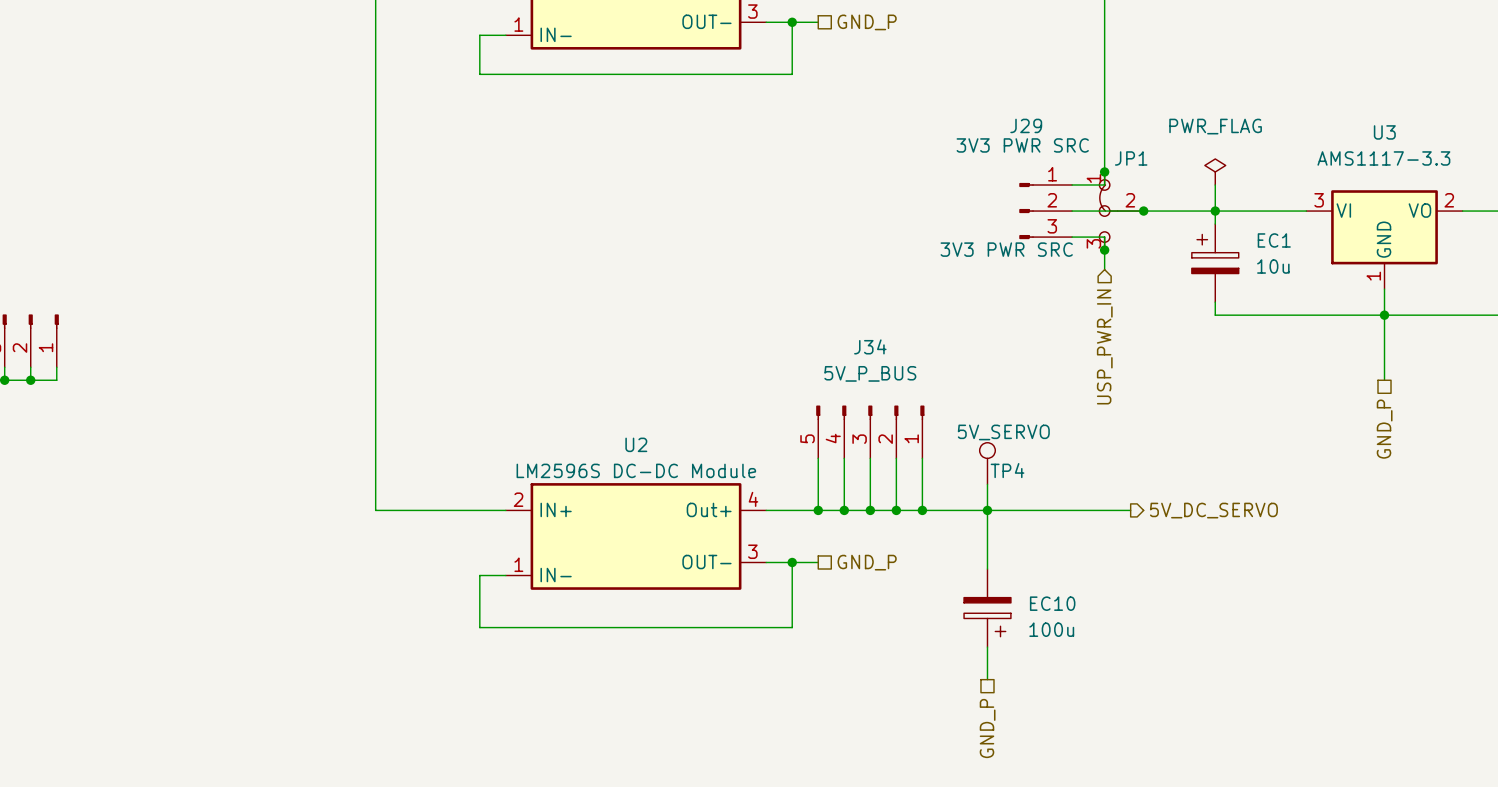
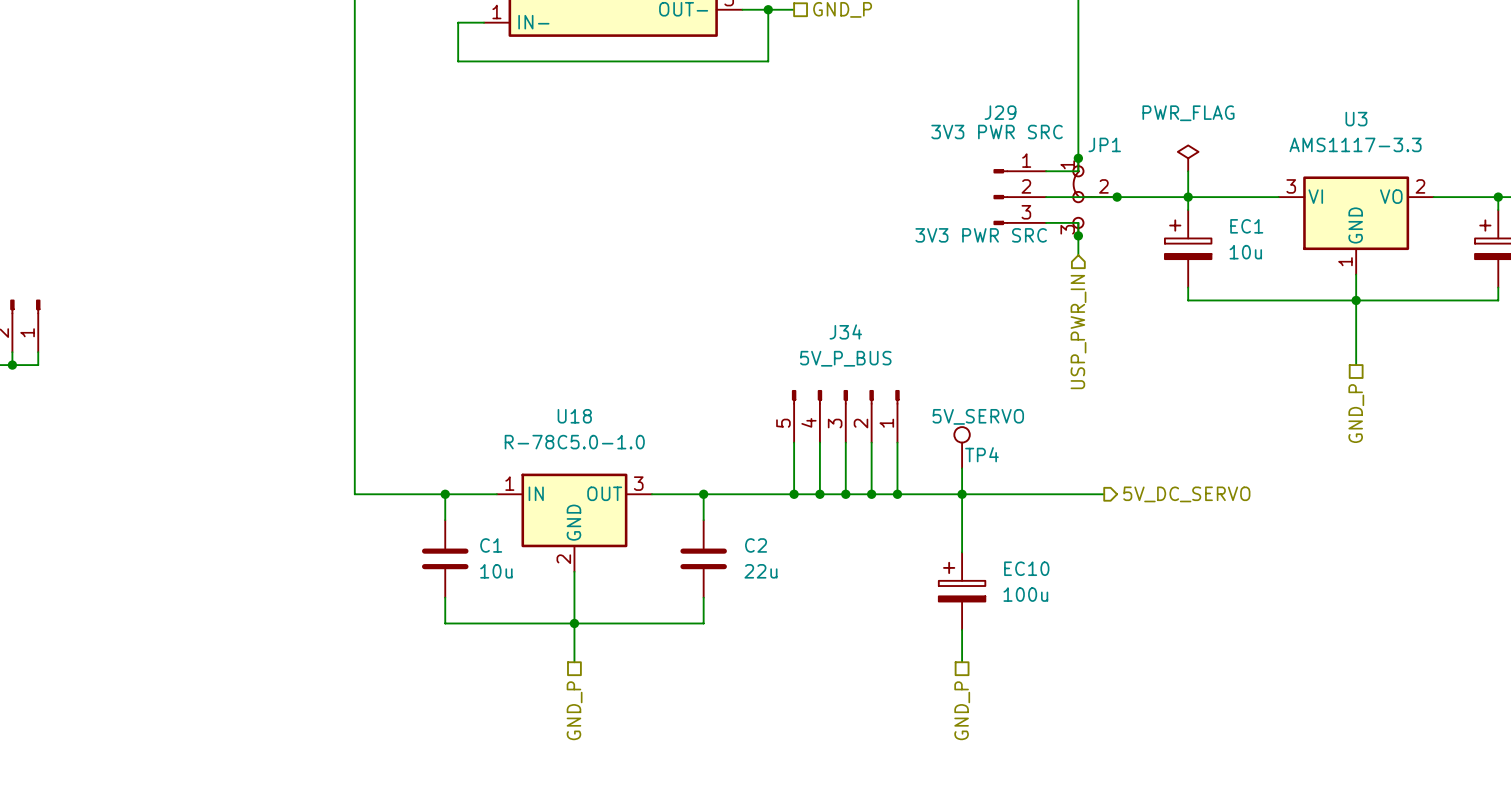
wire: none -> (445, 494) (445, 520)
junction: none -> (445, 494)
junction: none -> (703, 494)
U2: LM2596S DC-DC Module (636, 536) -> none
U18: none -> R-78C5.0-1.0 (574, 522)
wire: (766, 562) (818, 562) -> none
wire: (792, 562) (792, 627) (479, 627) (479, 575) (505, 575) -> none
junction: (792, 562) -> none
hierarchical label: GND_P (867, 562) -> none
C1: none -> 10u (445, 558)
C2: none -> 22u (703, 558)
wire: none -> (574, 571) (574, 662)
wire: none -> (445, 597) (445, 623) (703, 623) (703, 597)
EC10 rotation: 0° (987, 617) -> 180° (962, 582)
junction: none -> (574, 623)
hierarchical label: none -> GND_P (574, 710)

